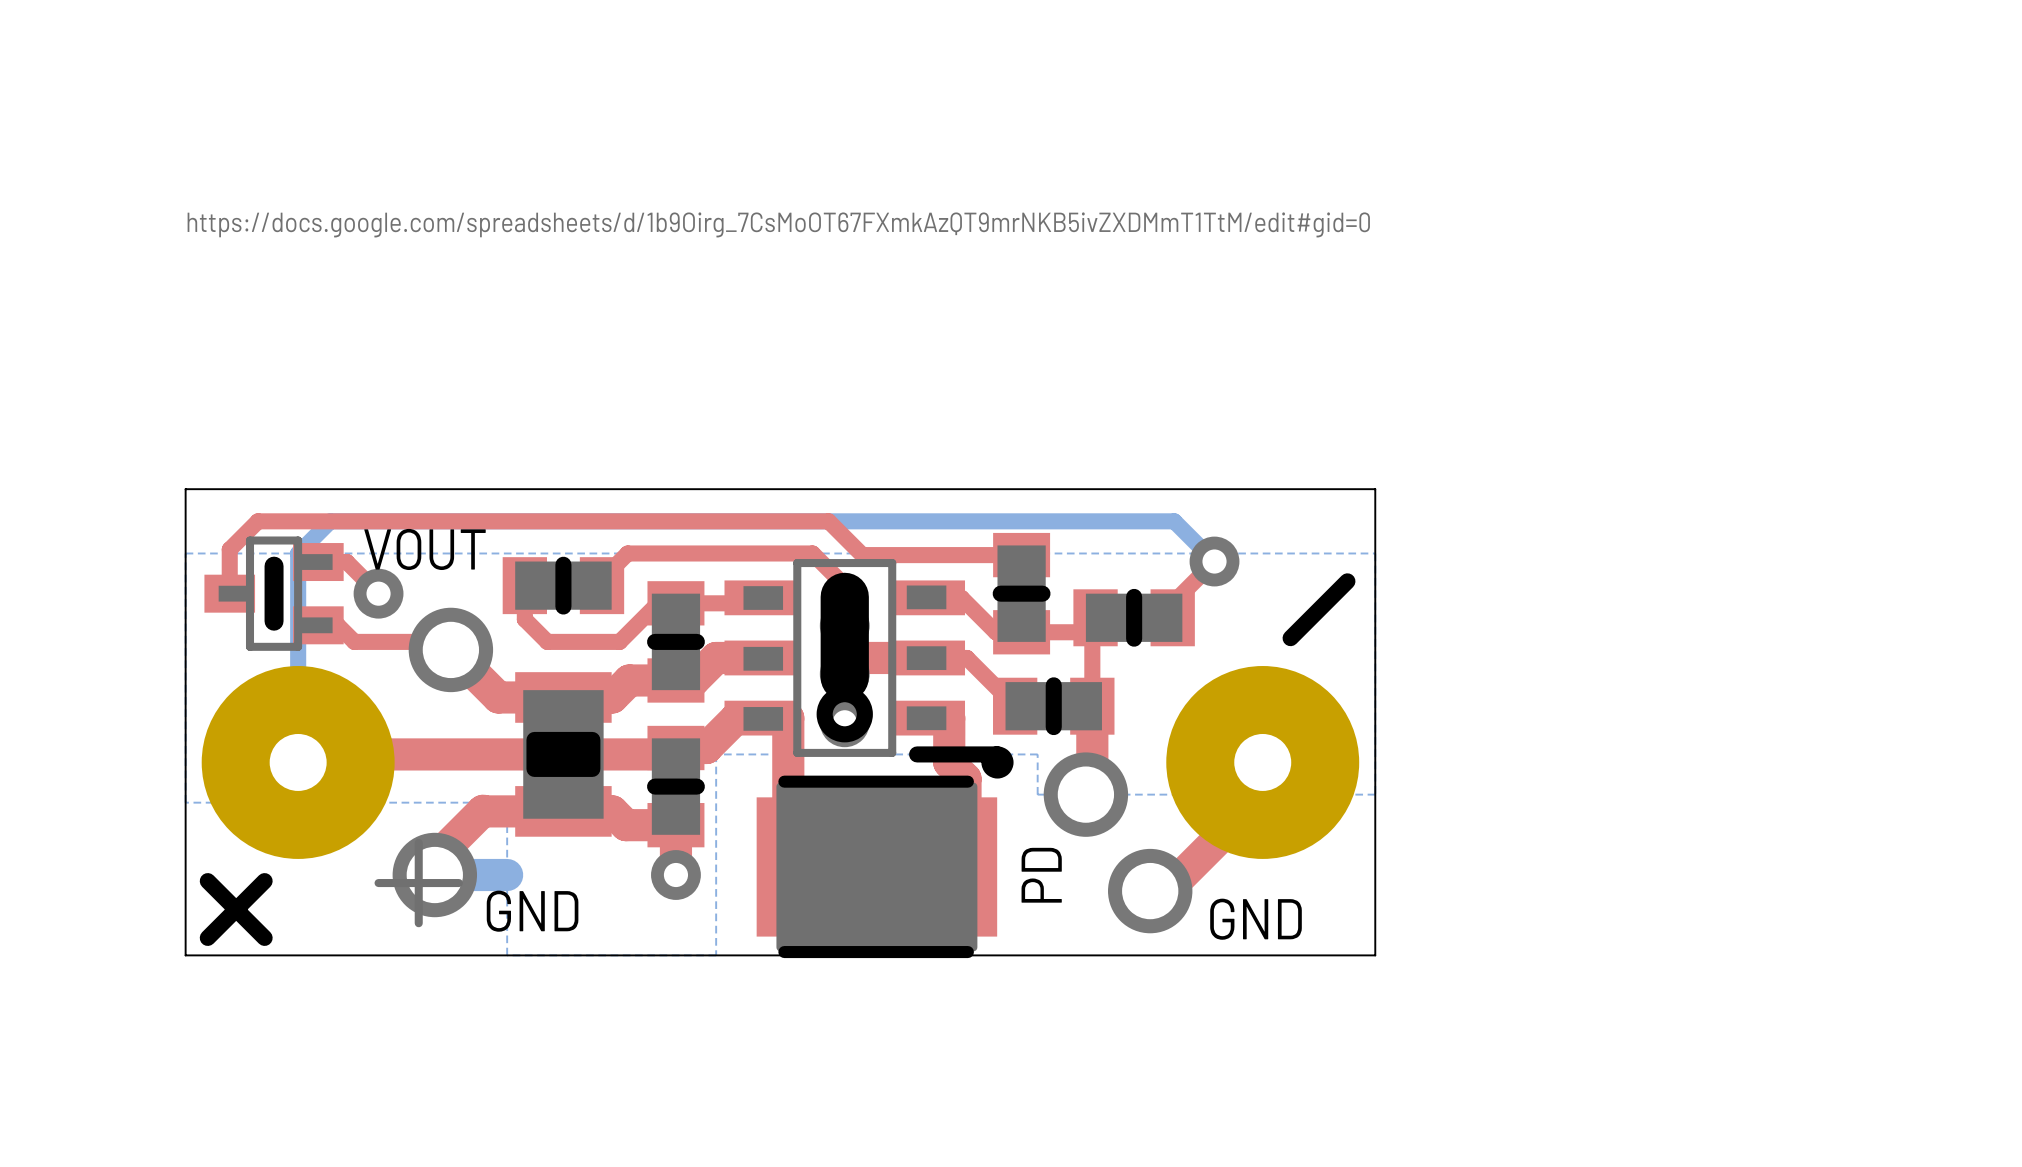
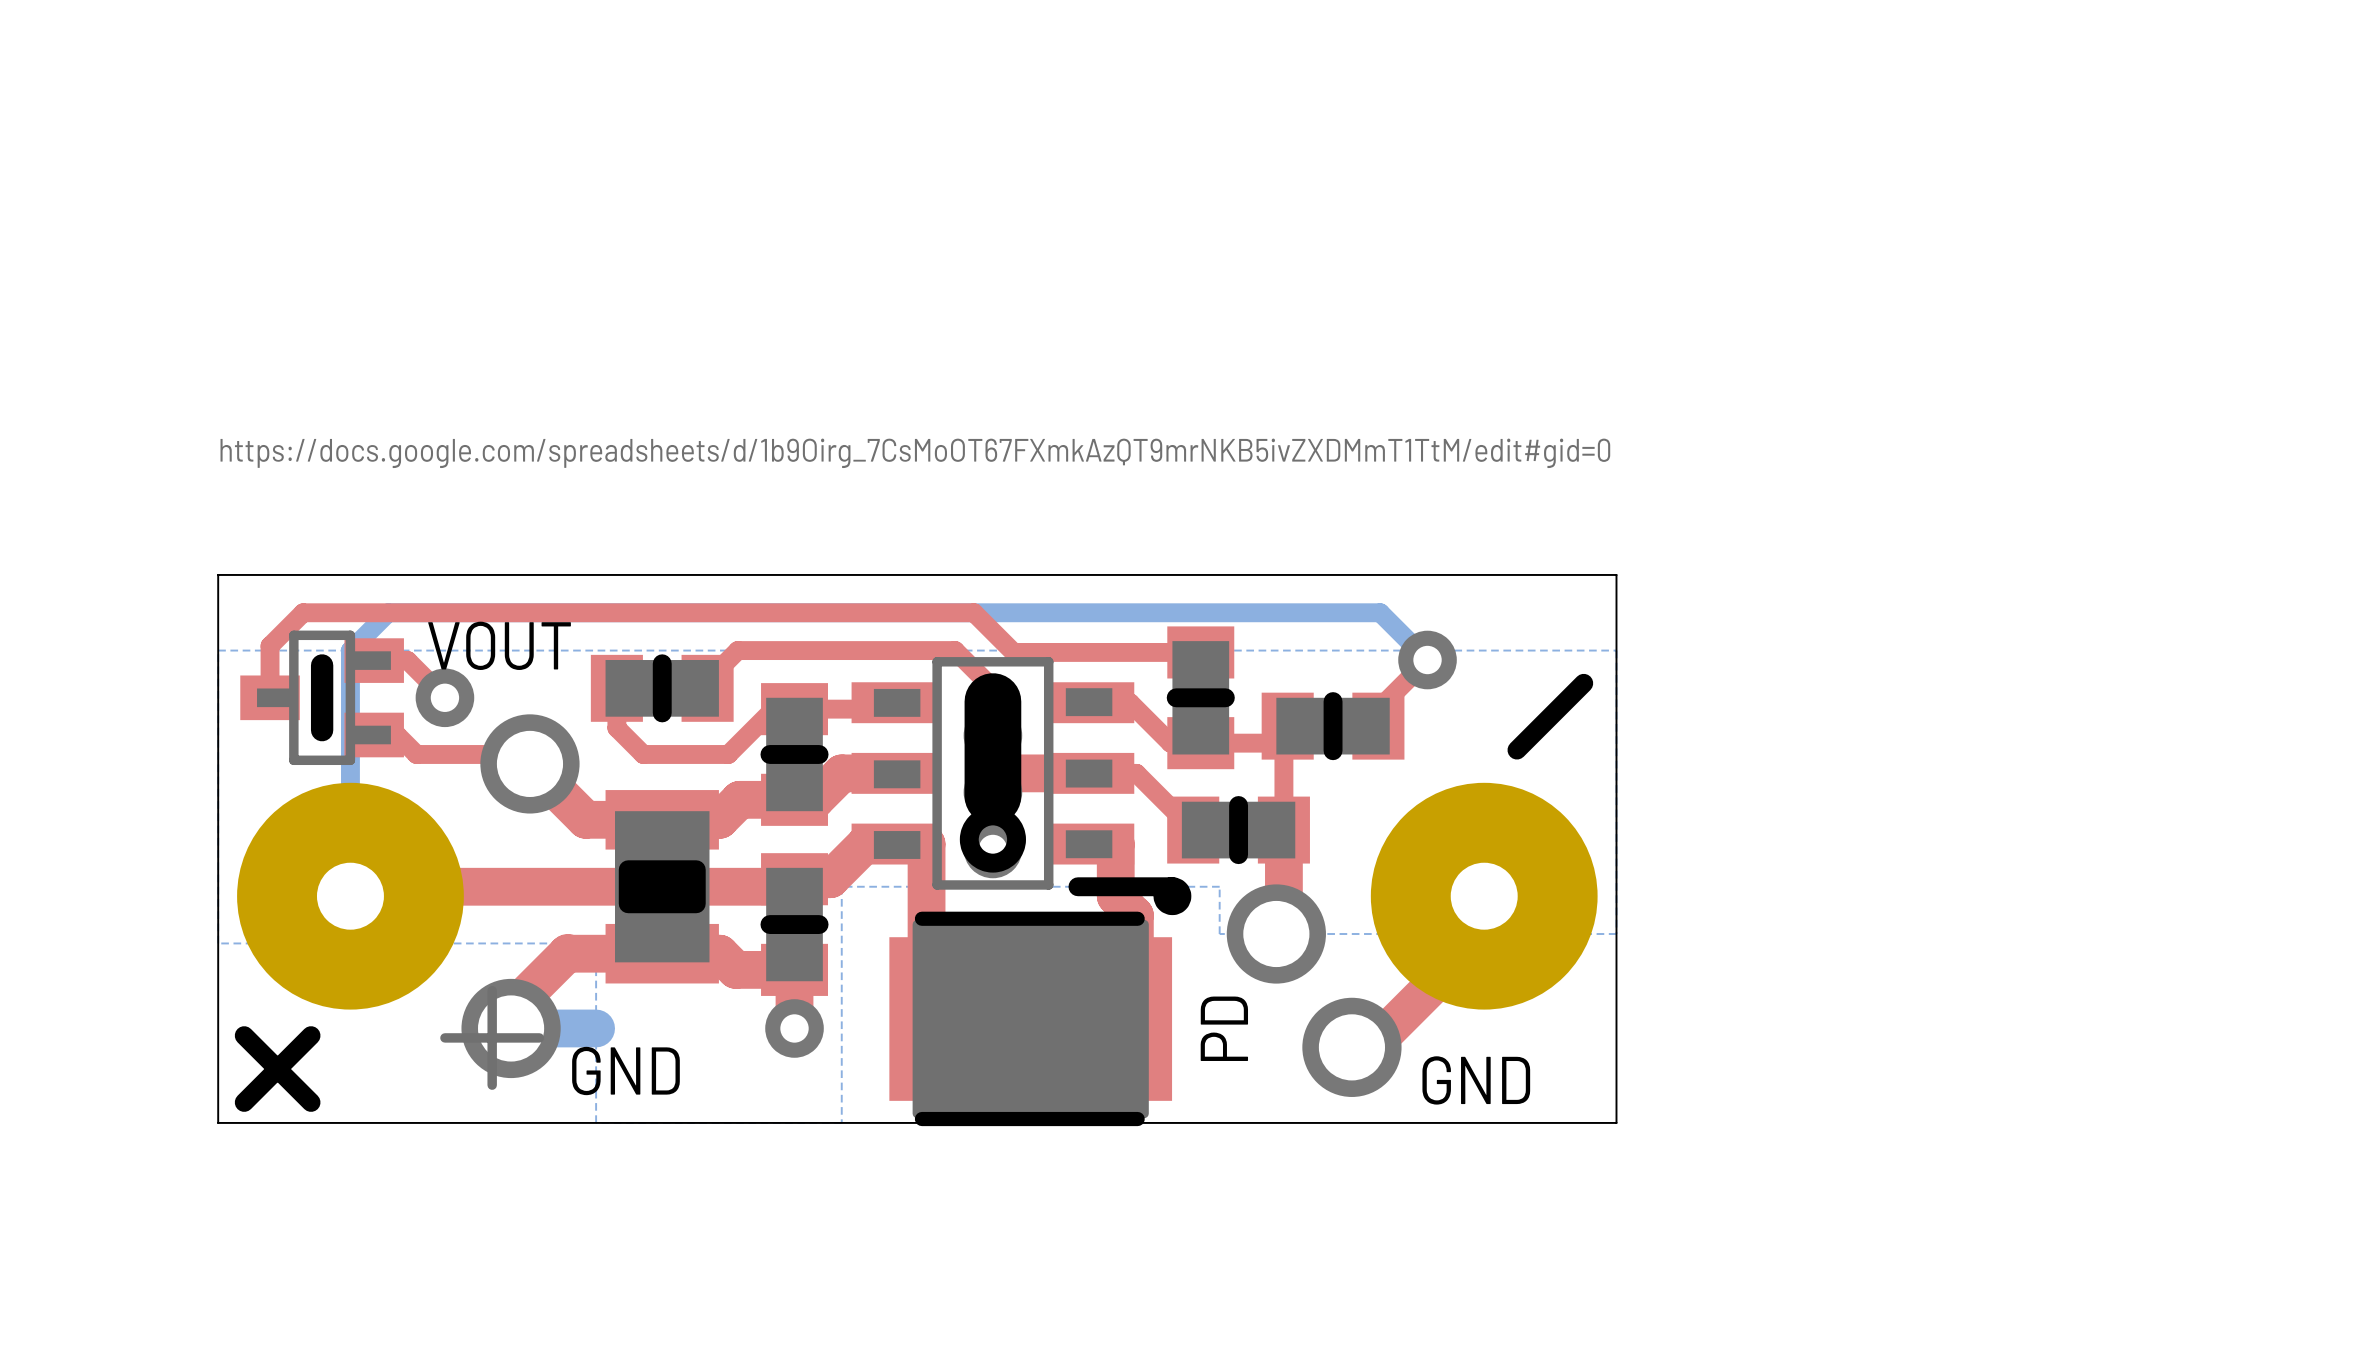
text position: https://docs.google.com/spreadsheets/d/1b9Oirg_7CsMoOT67FXmkAzQT9mrNKB5ivZXDMmT1TtM/edit#gid=0 (778, 224) -> https://docs.google.com/spreadsheets/d/1b9Oirg_7CsMoOT67FXmkAzQT9mrNKB5ivZXDMmT1TtM/edit#gid=0 (915, 453)

